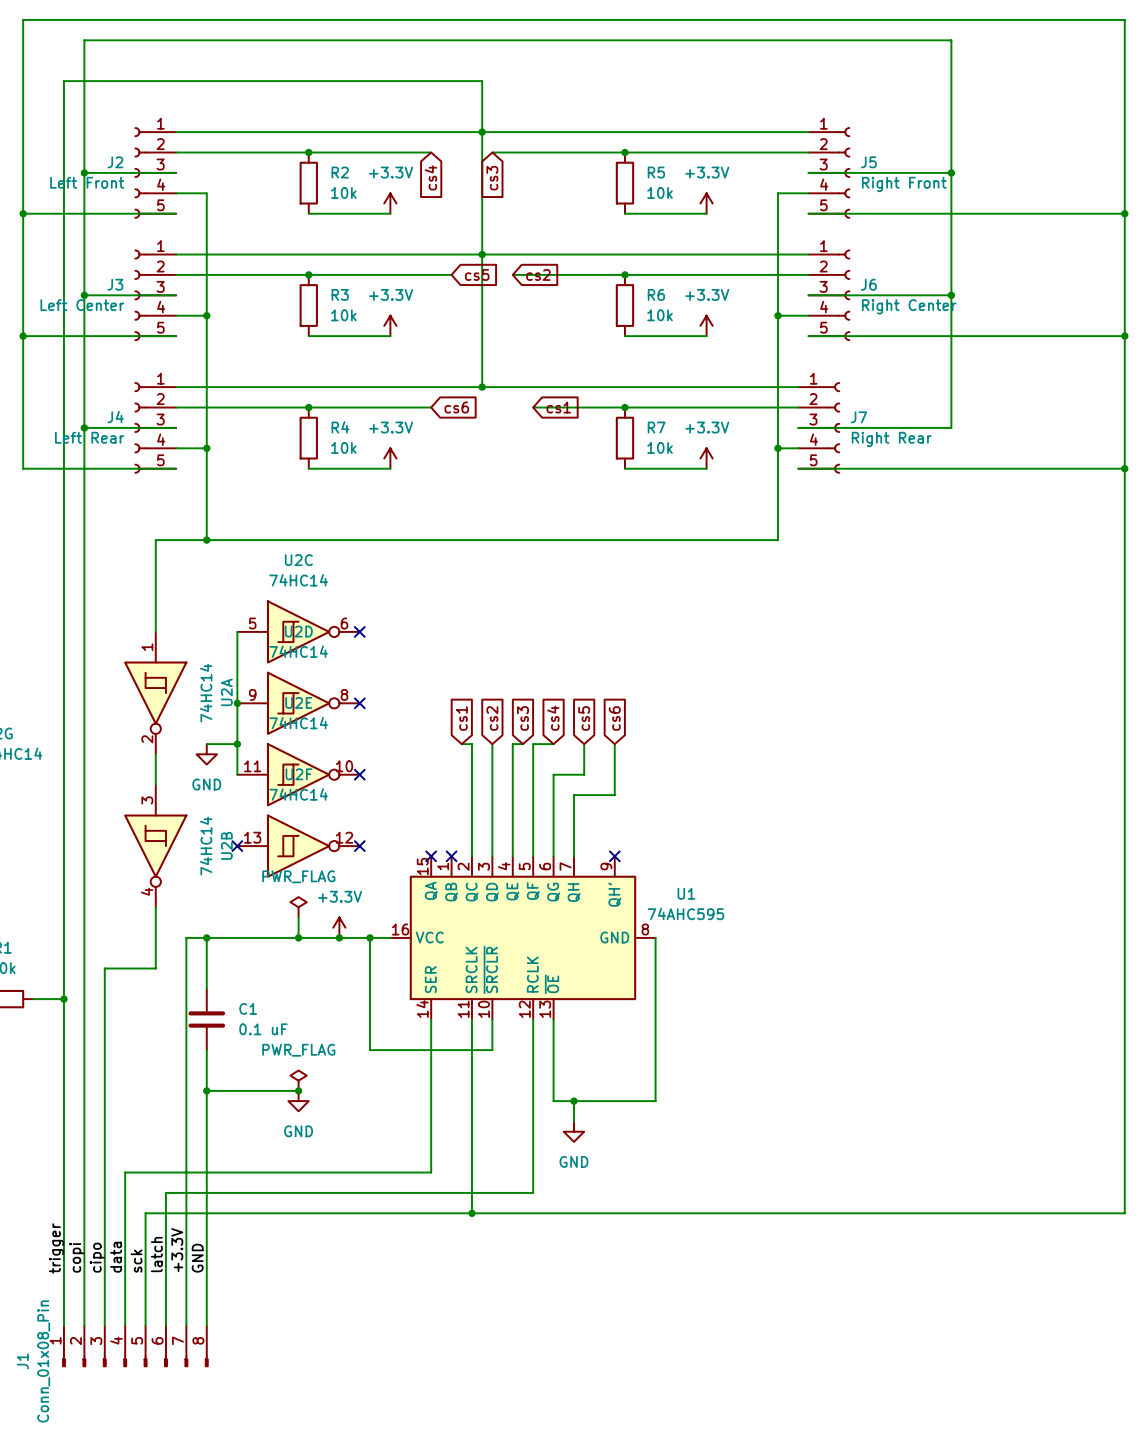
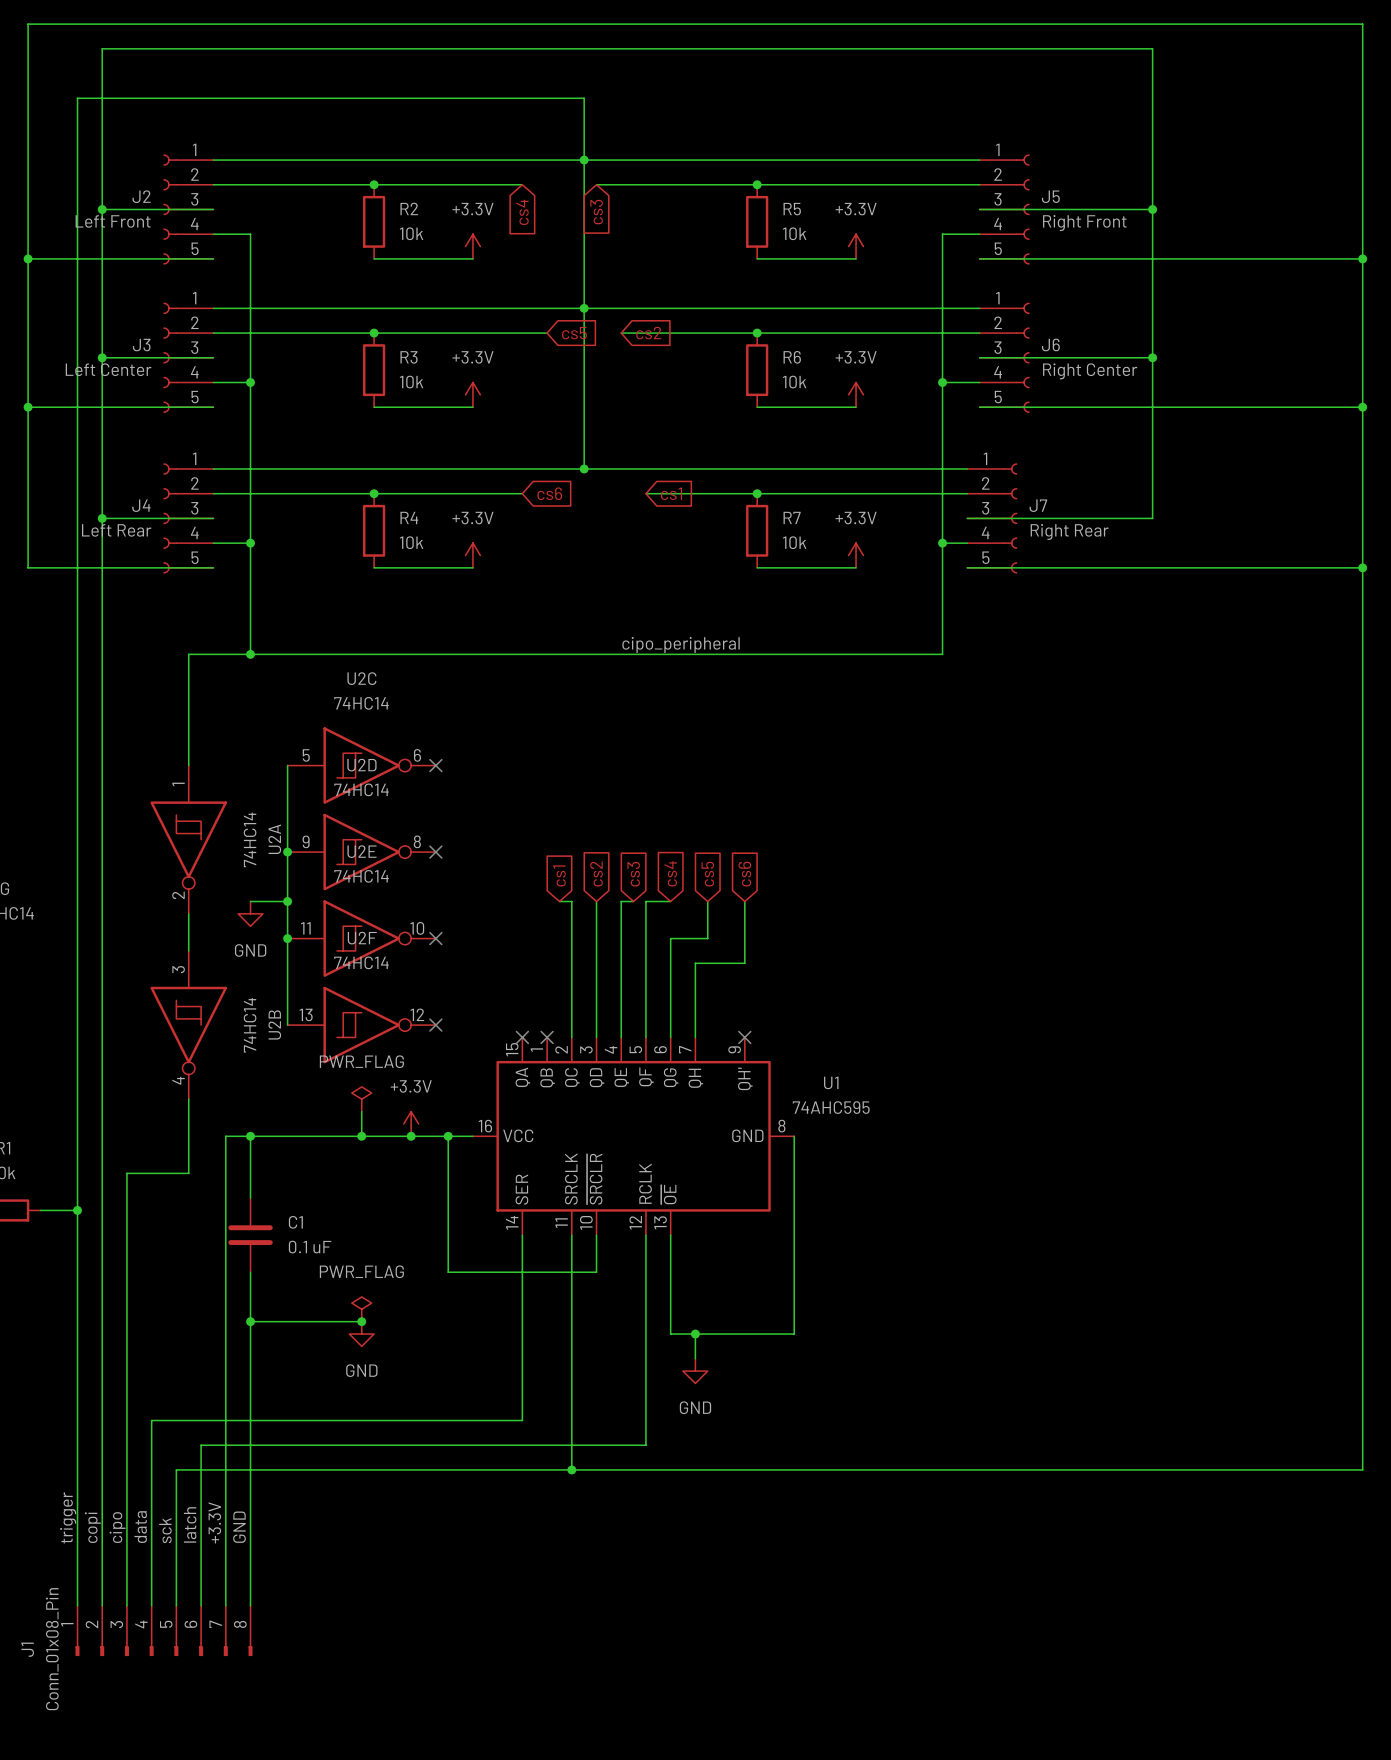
label: none -> cipo_peripheral (681, 644)
wire: none -> (287, 938) (287, 1025)
junction: none -> (287, 938)
no-connect mark: (237, 846) -> none

